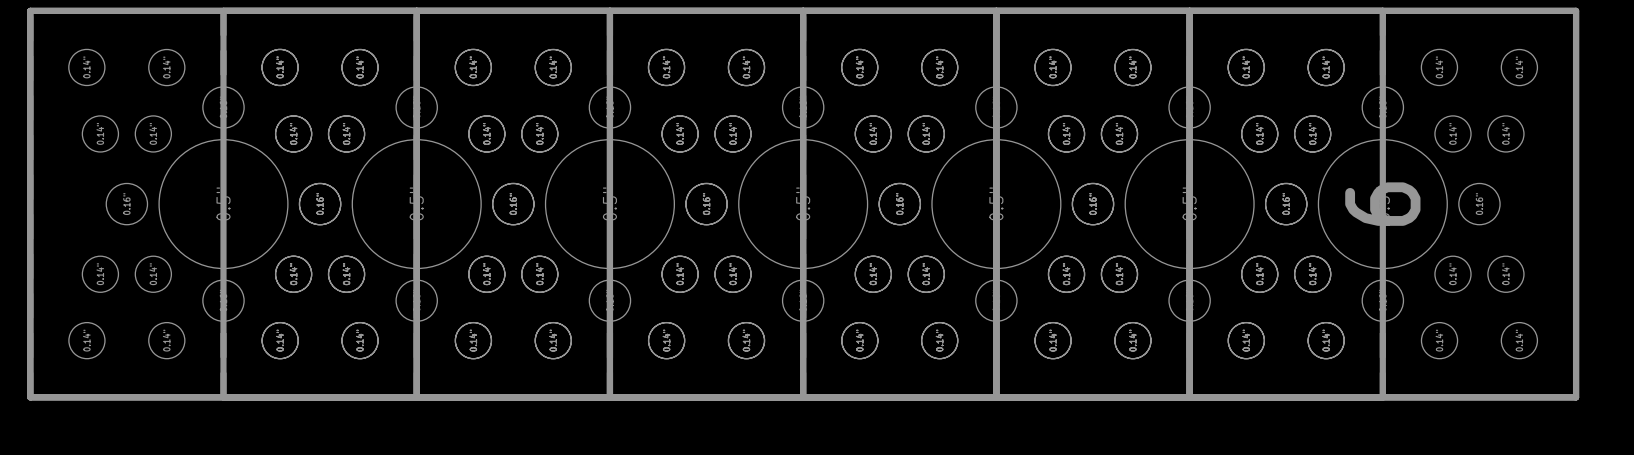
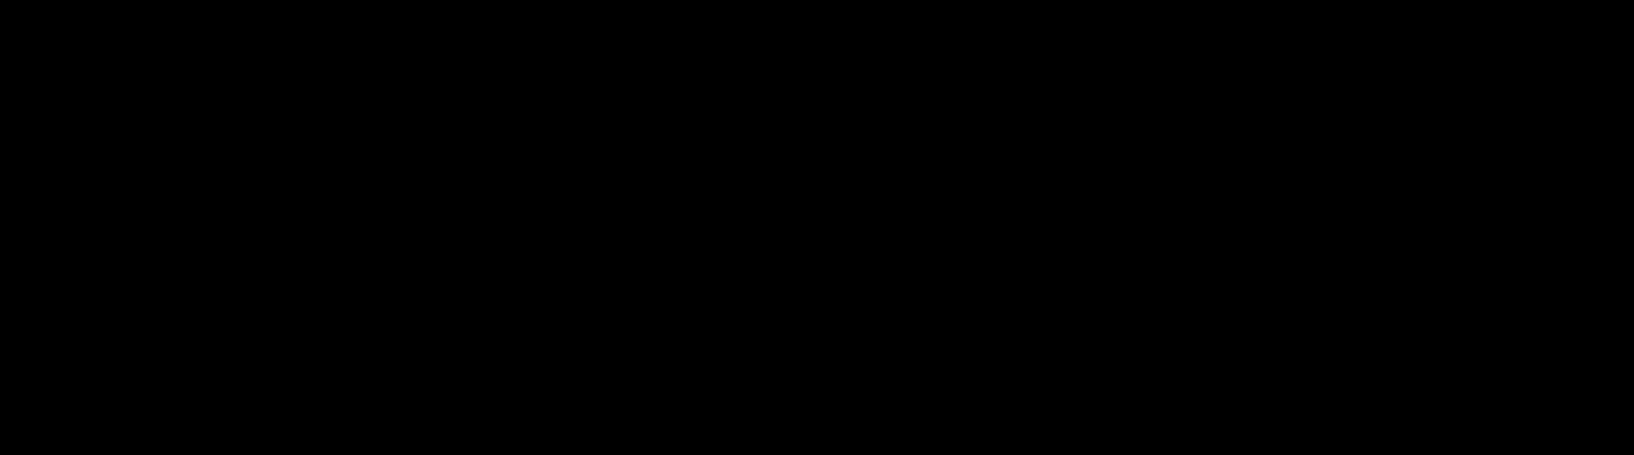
drawing: [27, 7, 1580, 401] -> none

